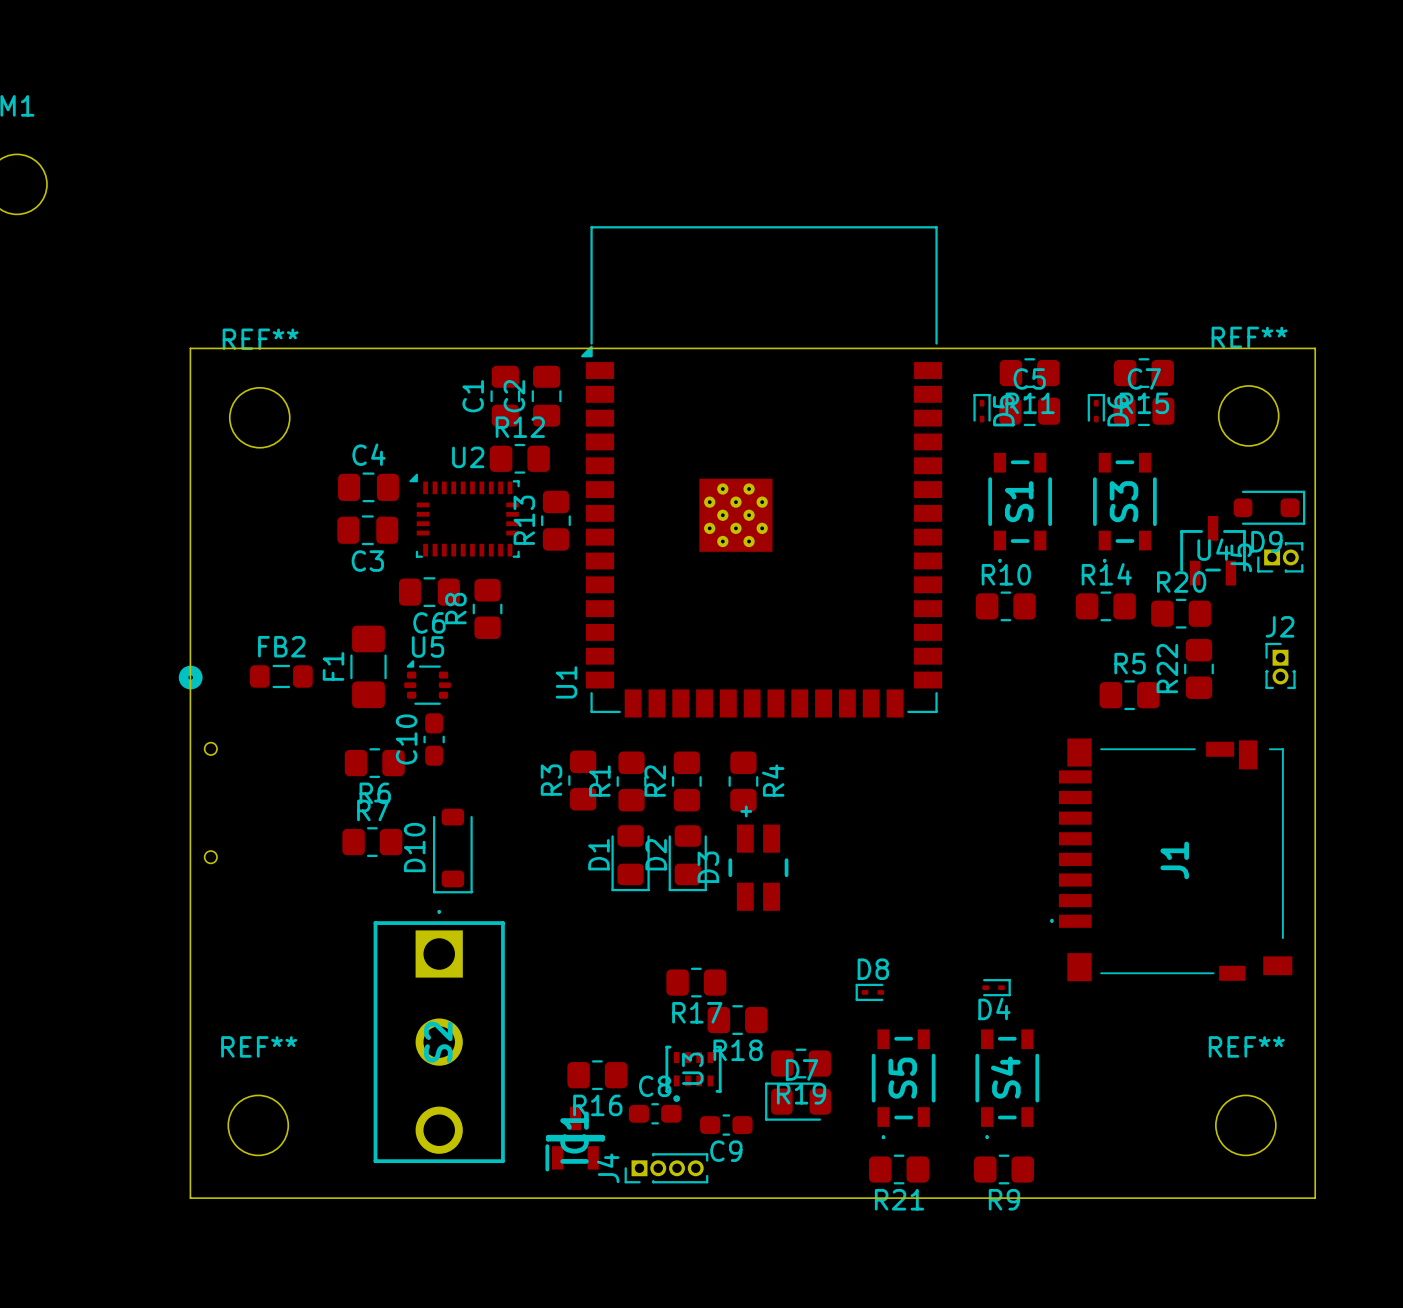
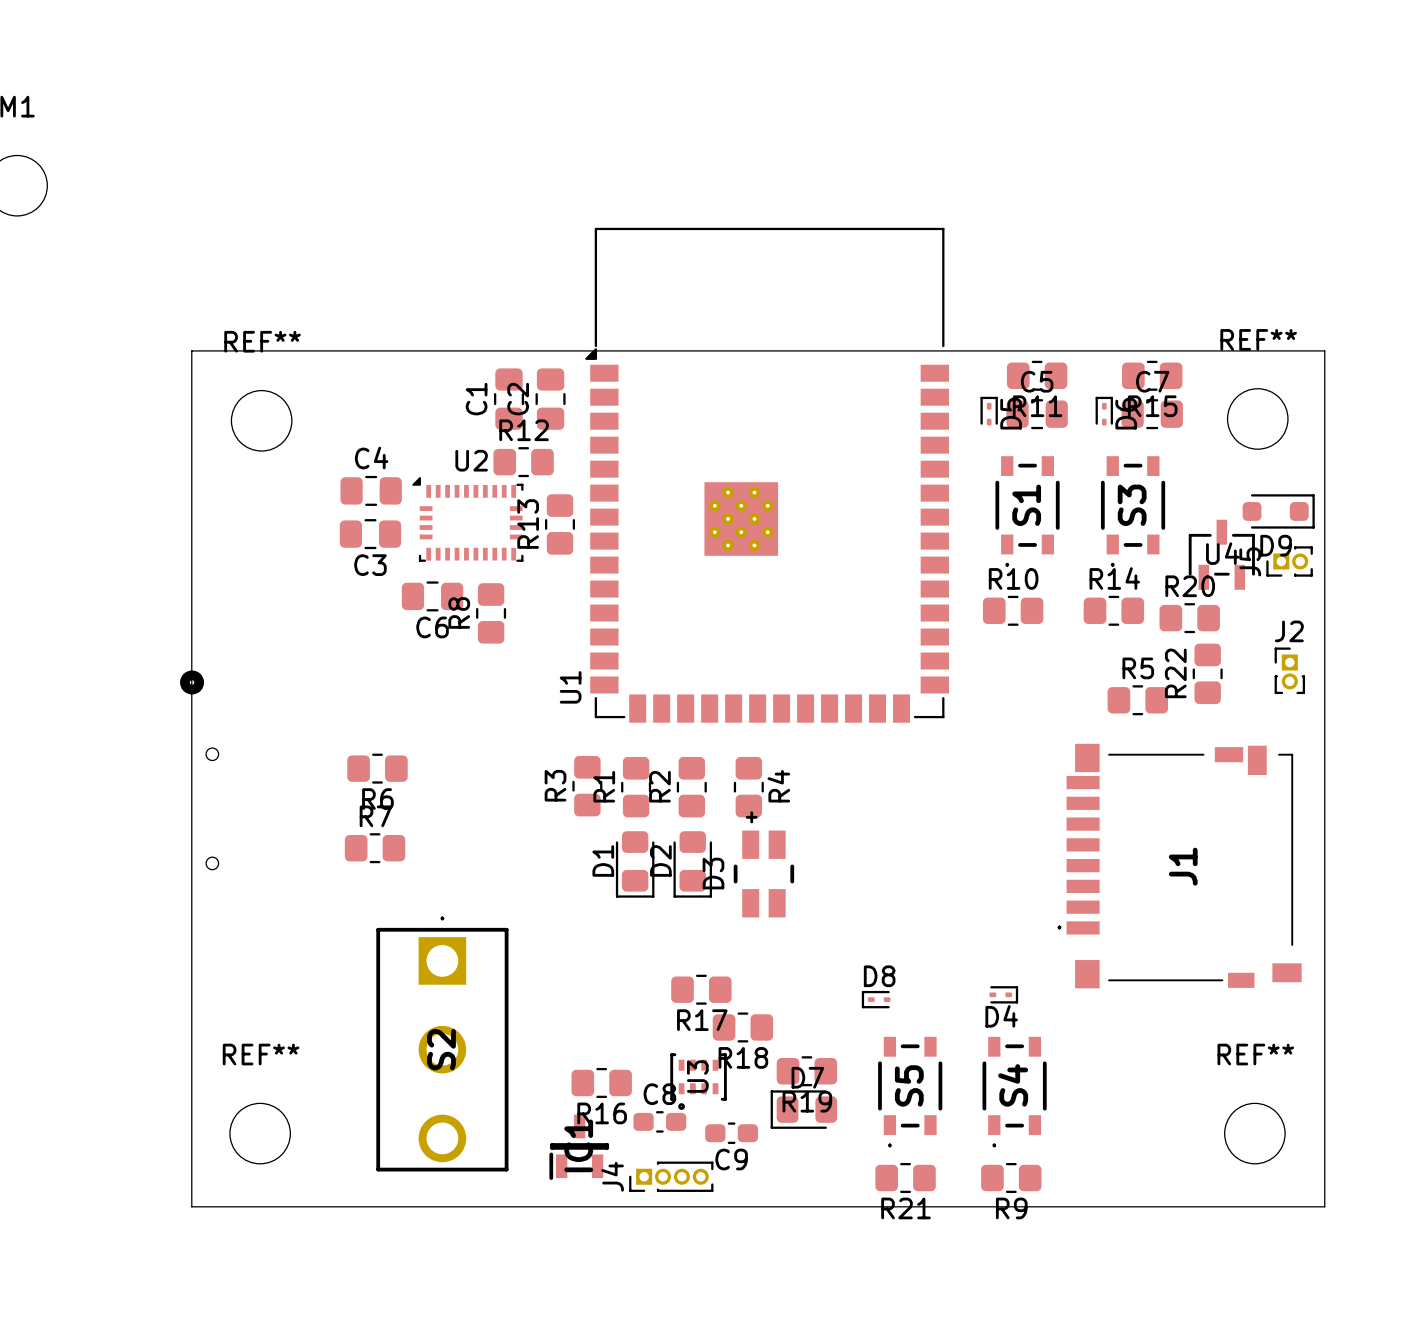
F1: (368, 666) -> none
FB2: (281, 676) -> none
U5: (427, 682) -> none
C10: (434, 739) -> none
D10: (452, 851) -> none

